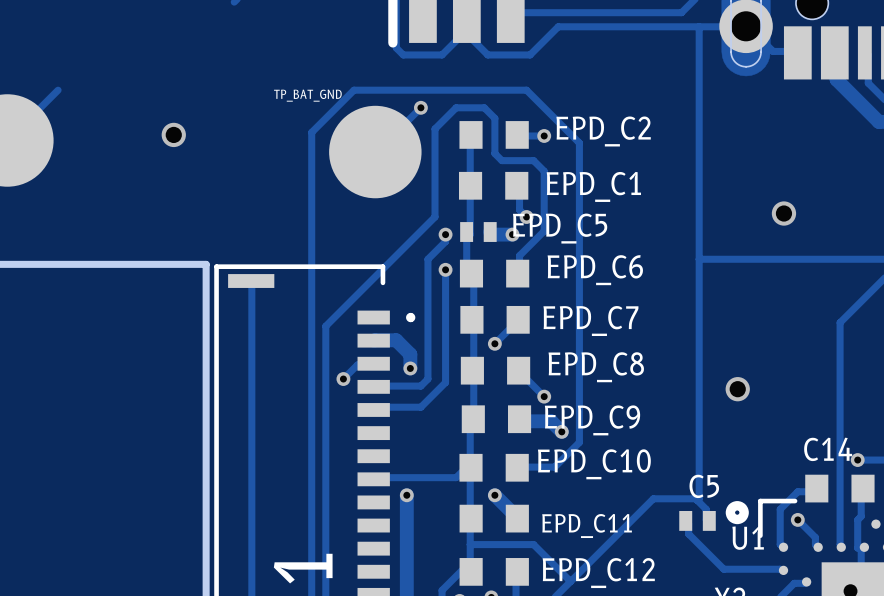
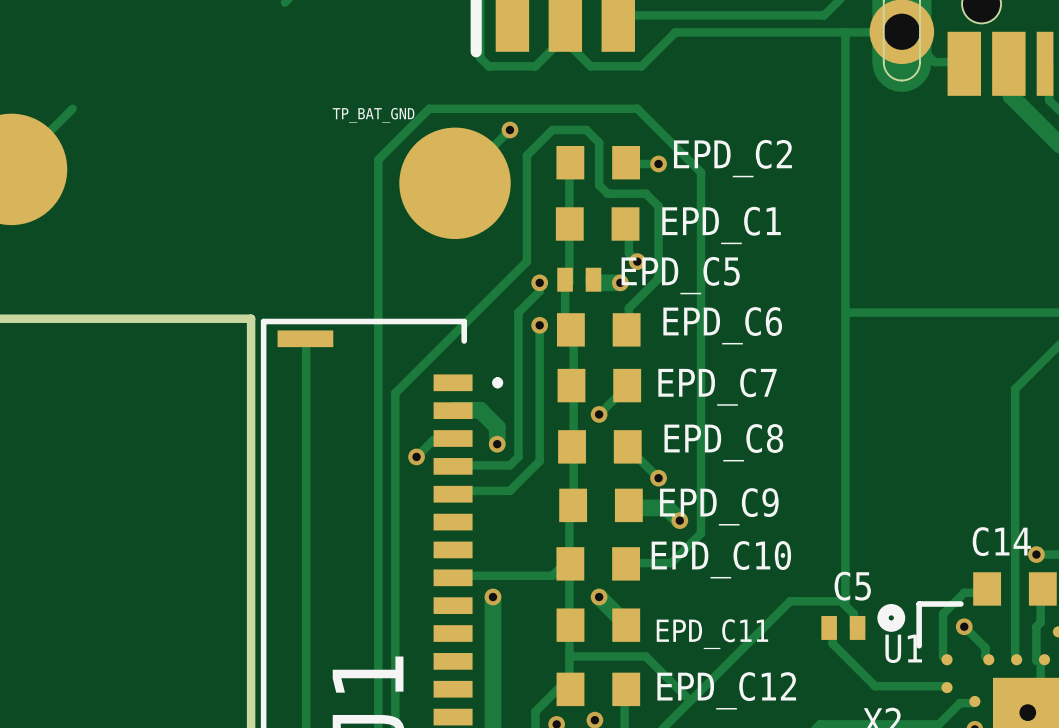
via: (173, 134) -> none
via: (783, 213) -> none
via: (737, 389) -> none

